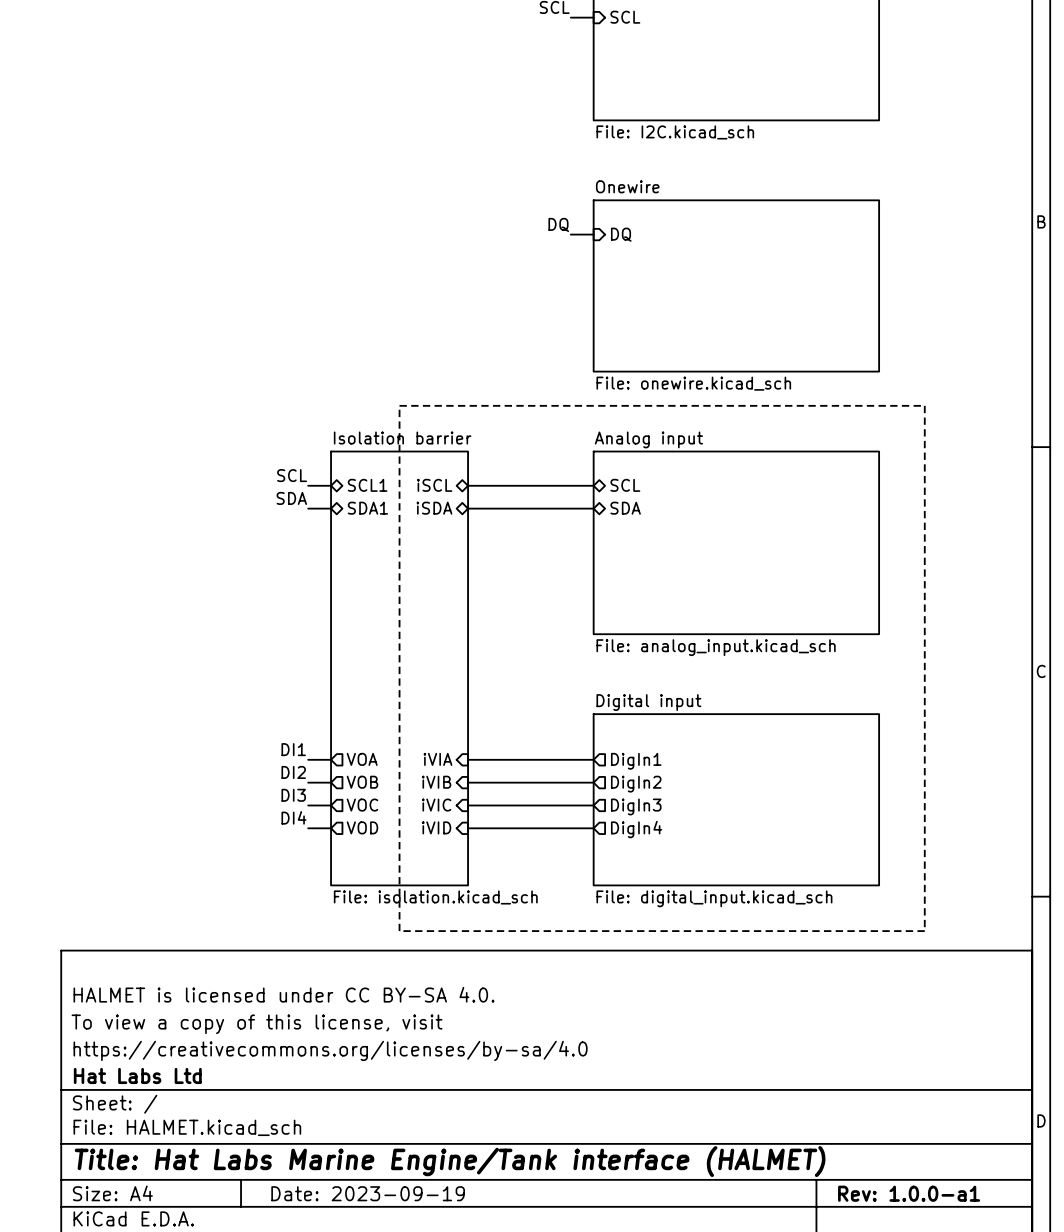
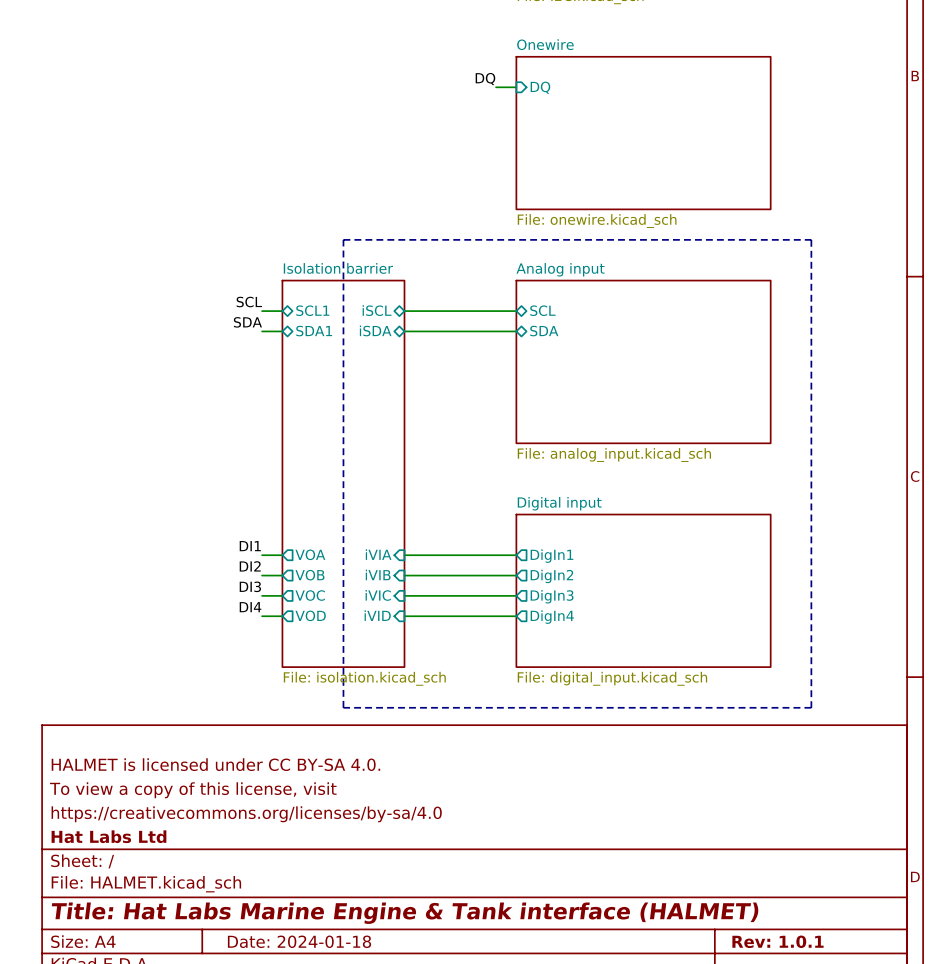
title block: Title: Hat Labs Marine Engine/Tank interface (HALMET) (450, 1161) -> Title: Hat Labs Marine Engine & Tank interface (HALMET) (405, 913)
title block: Date: 2023-09-19 (368, 1193) -> Date: 2024-01-18 (299, 941)
title block: Rev: 1.0.0-a1 (909, 1193) -> Rev: 1.0.1 (777, 941)

